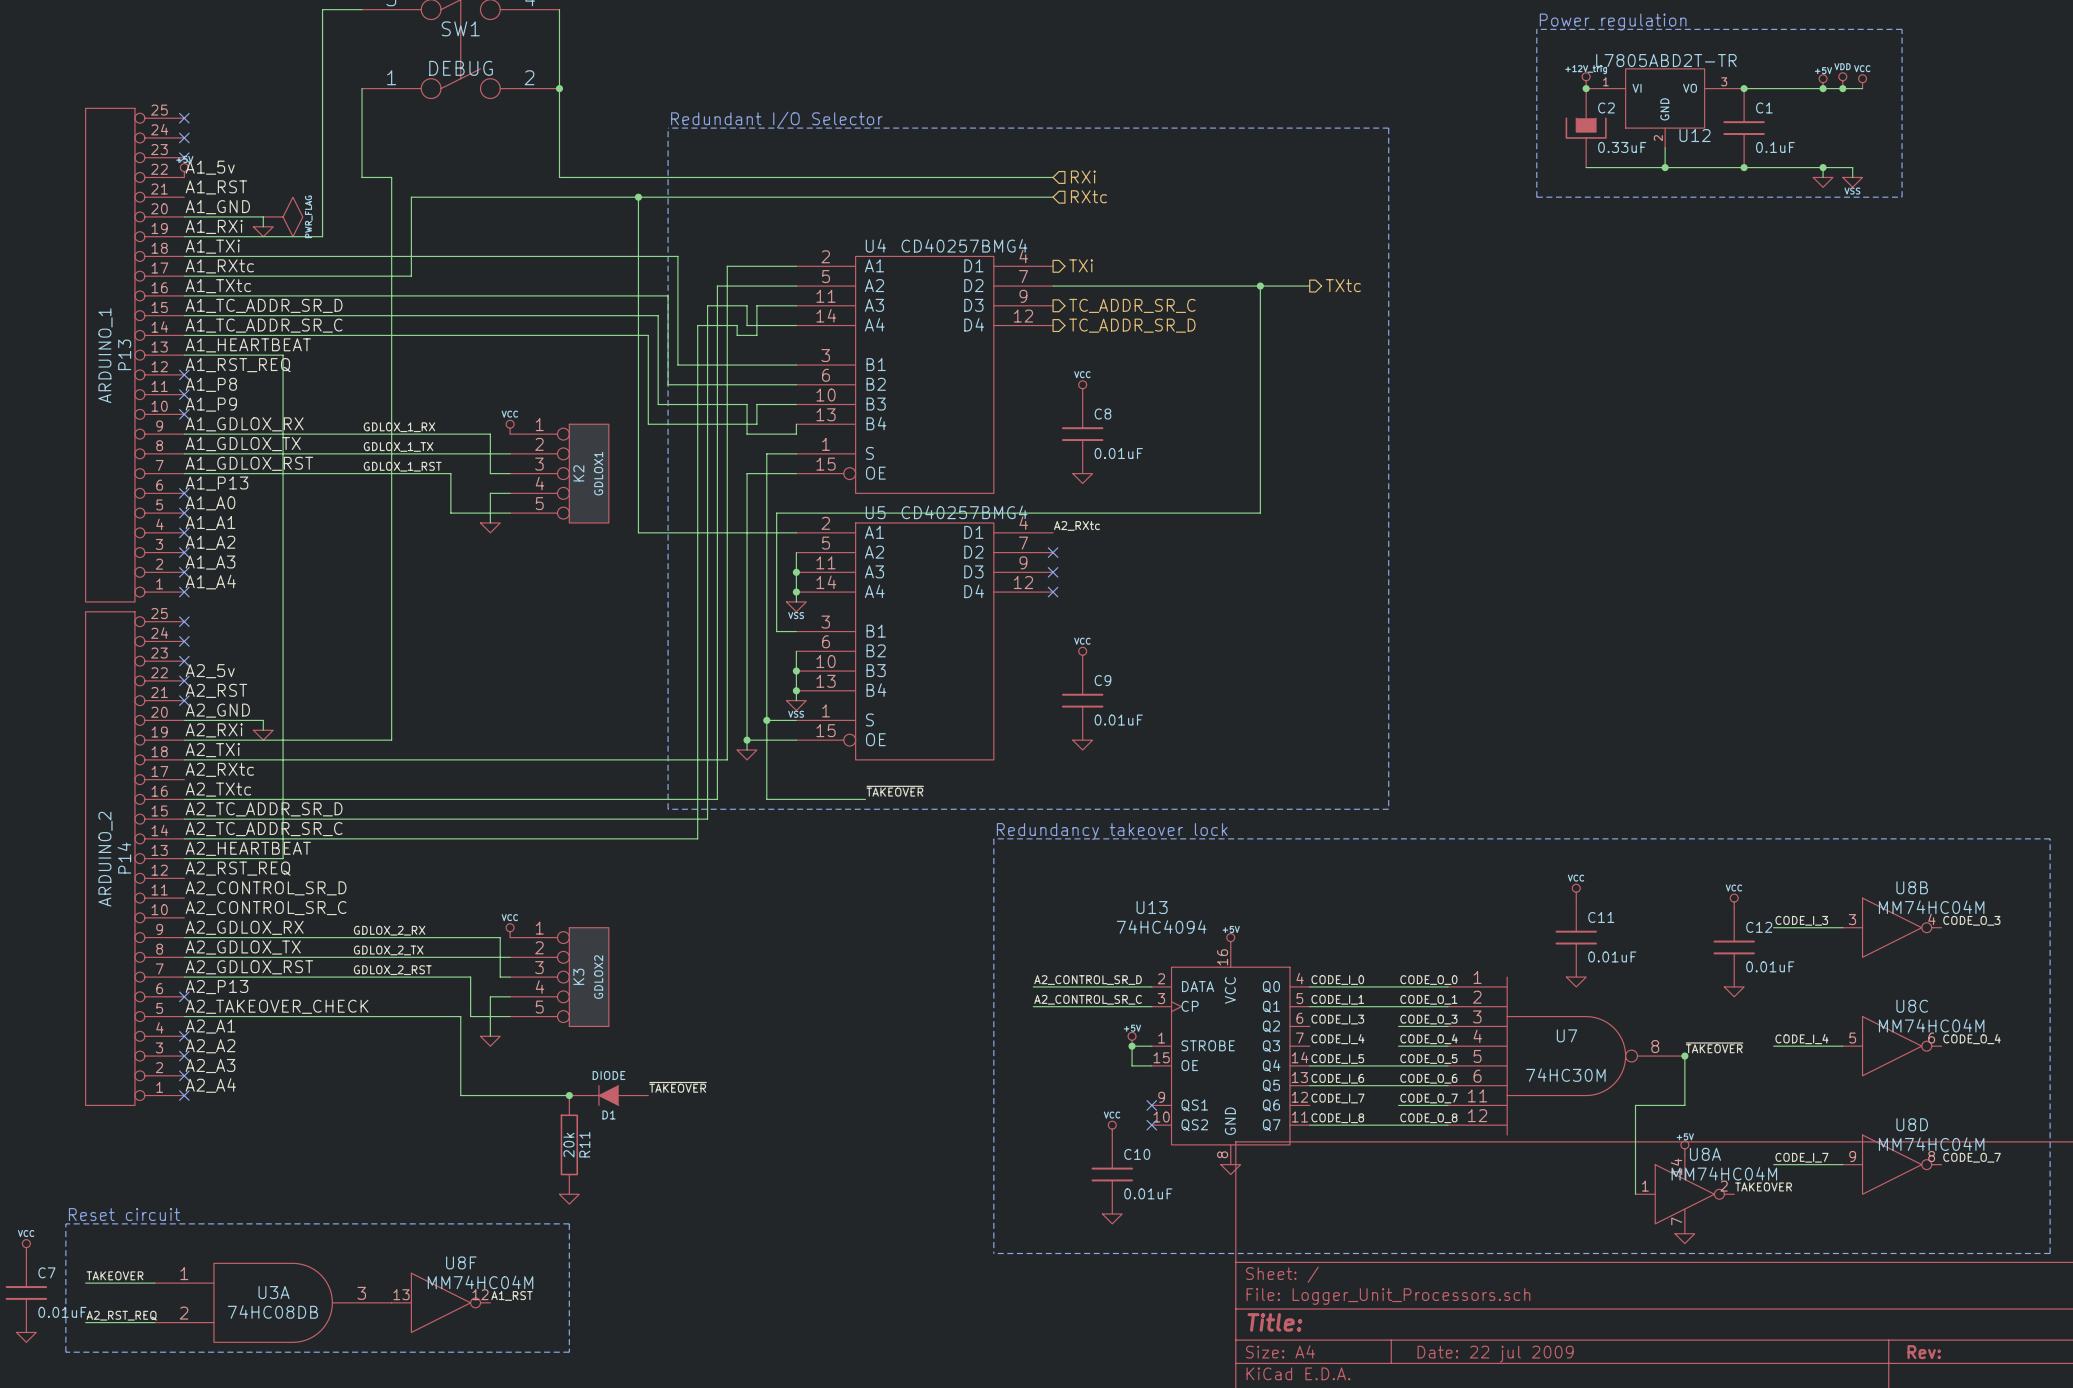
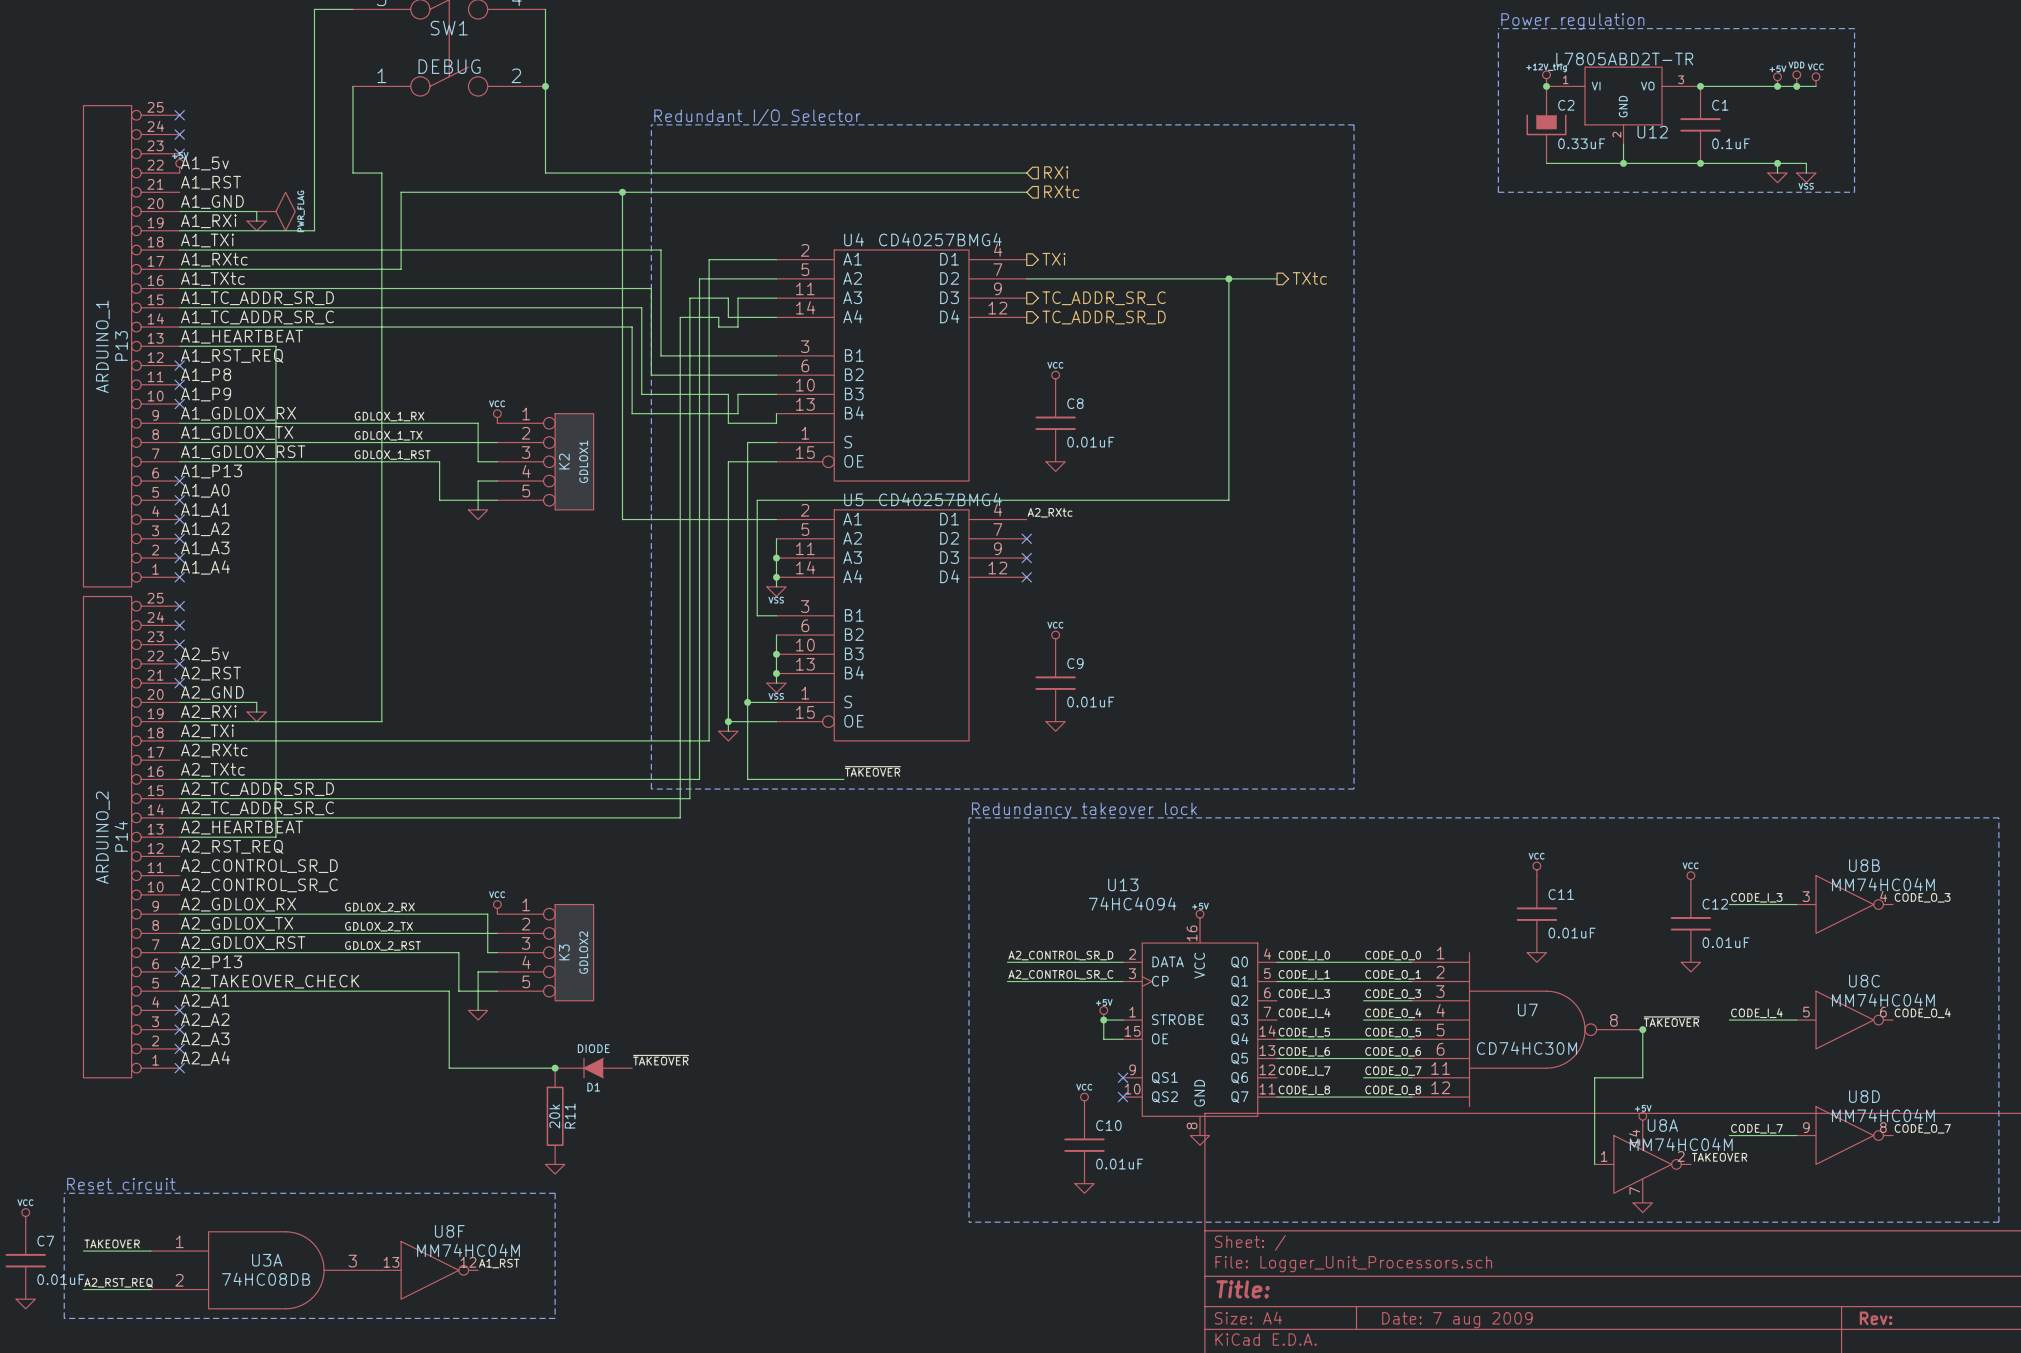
U7 value: 74HC30M (1565, 1075) -> CD74HC30M (1526, 1048)
title block: Date: 22 jul 2009 (1495, 1354) -> Date: 7 aug 2009 (1457, 1320)

